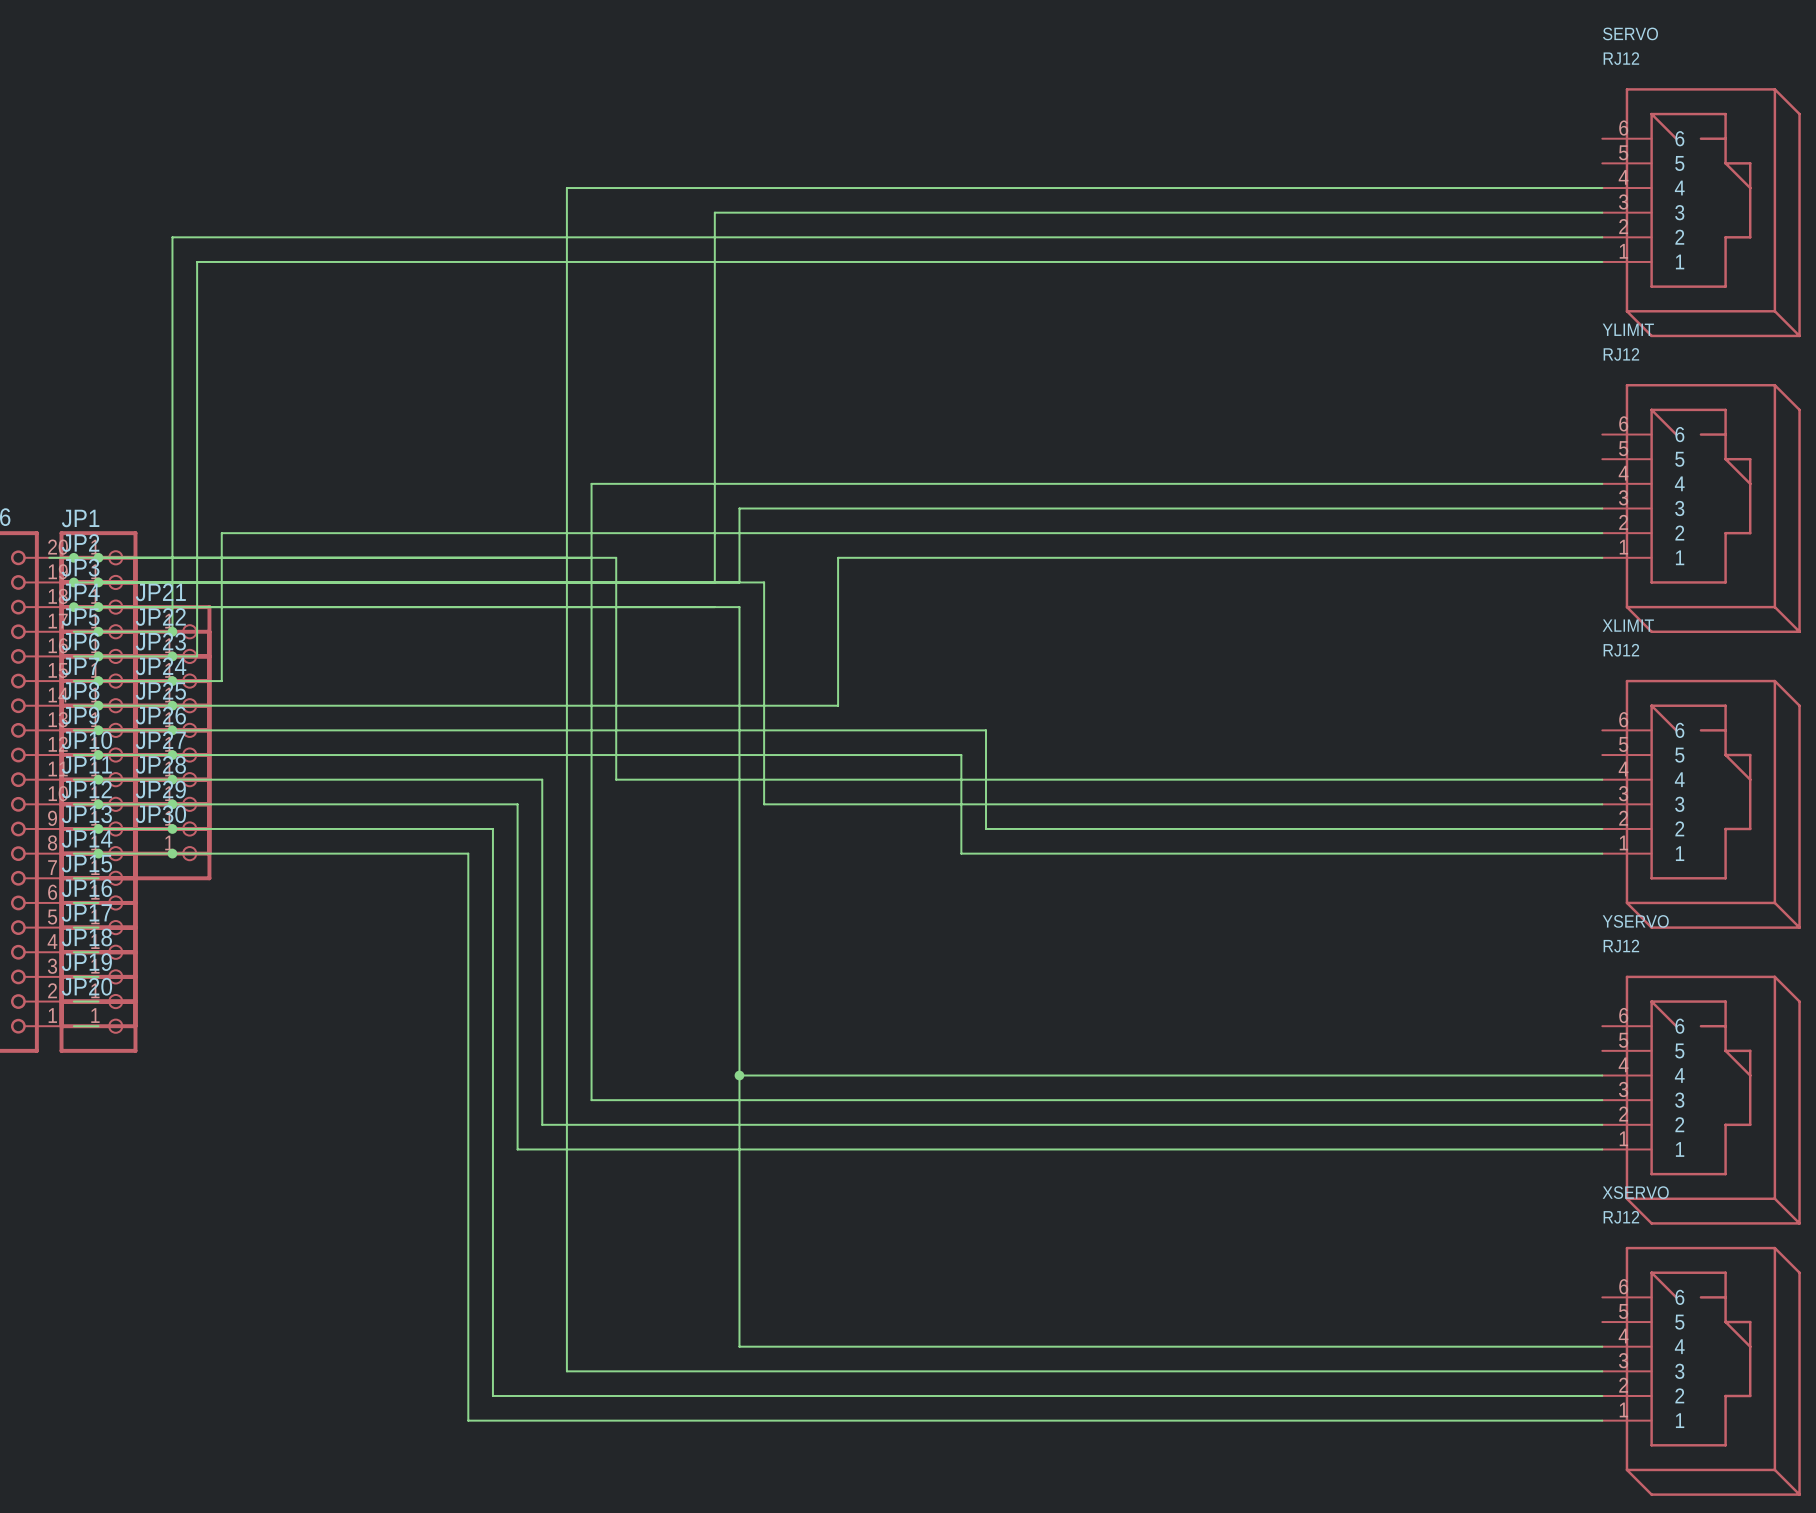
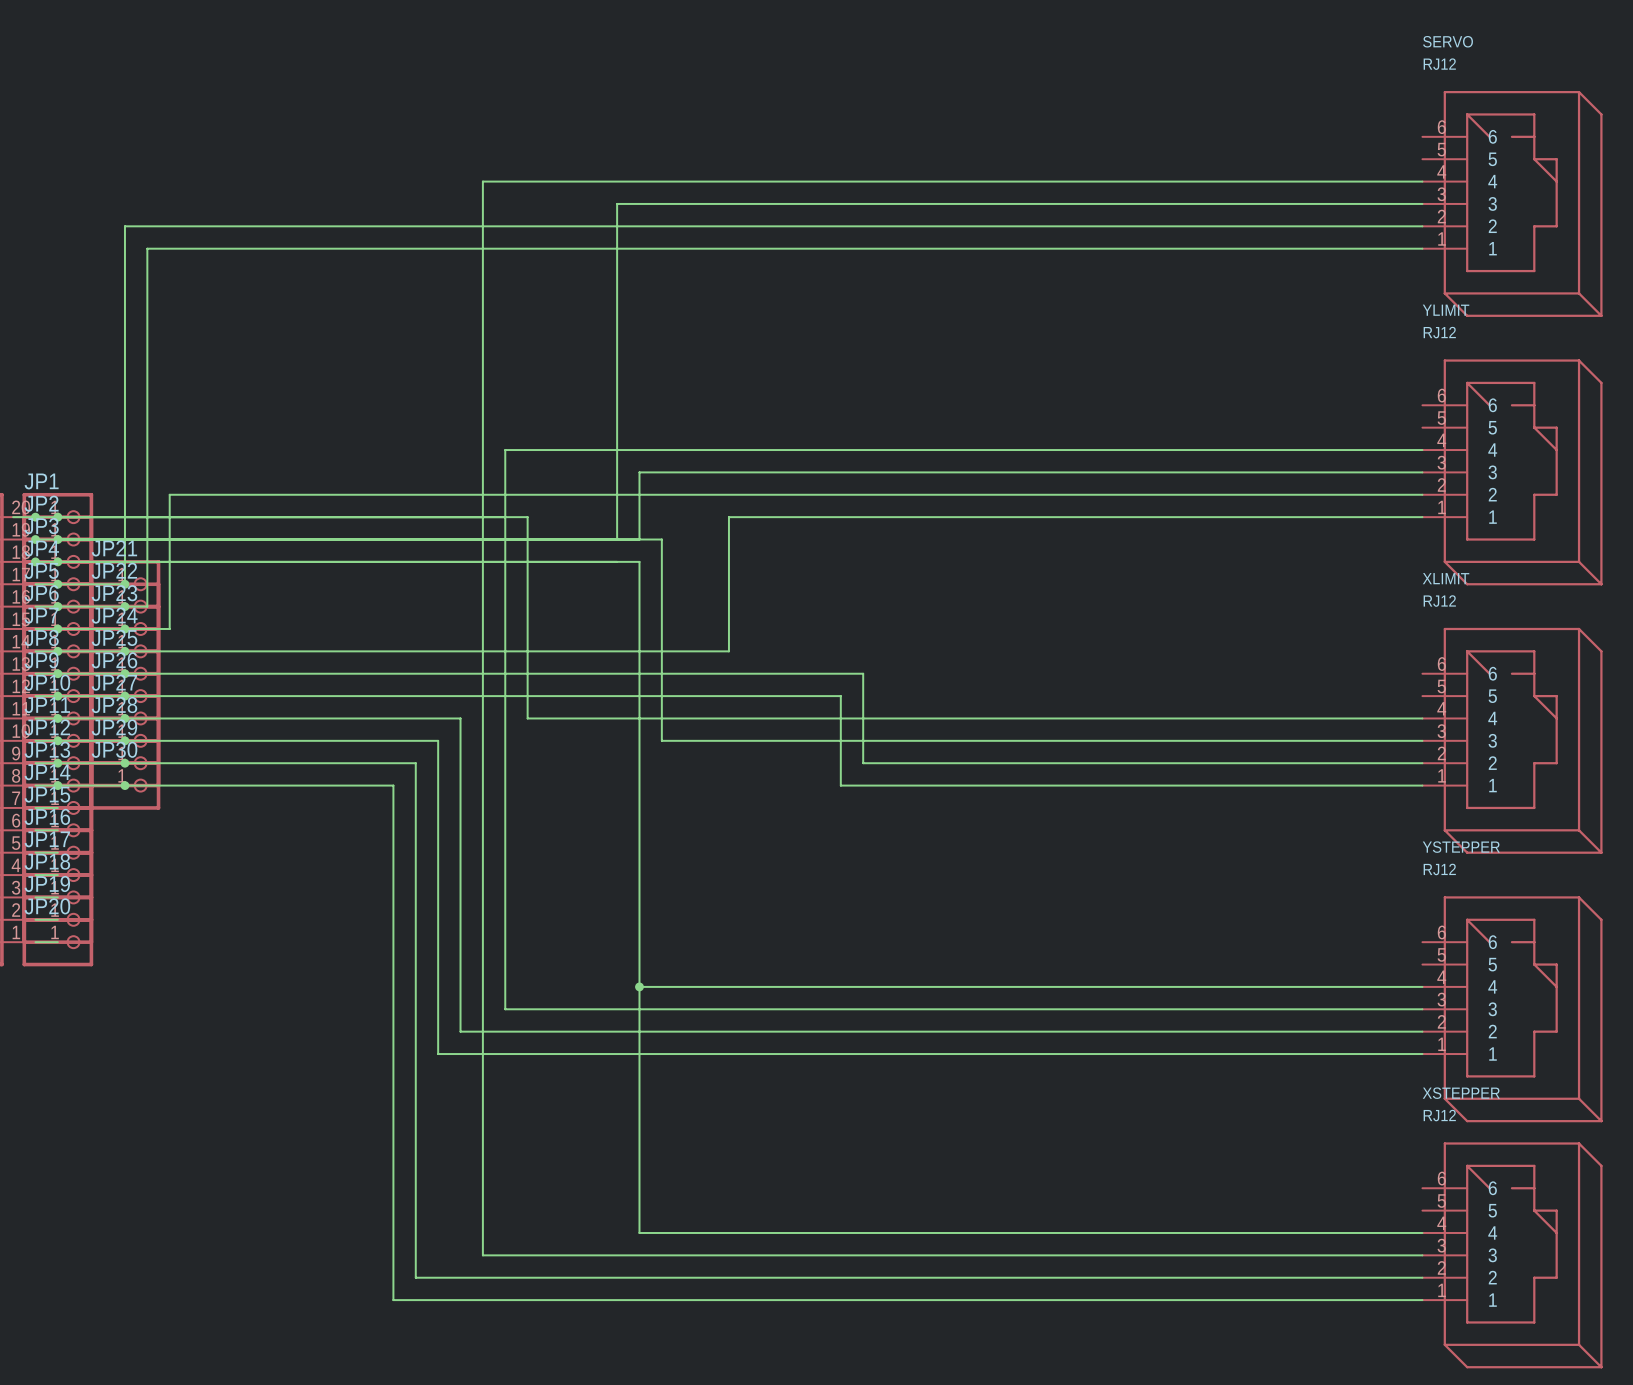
YSERVO name: YSERVO (1635, 921) -> YSTEPPER (1461, 847)
XSERVO name: XSERVO (1635, 1192) -> XSTEPPER (1461, 1093)

